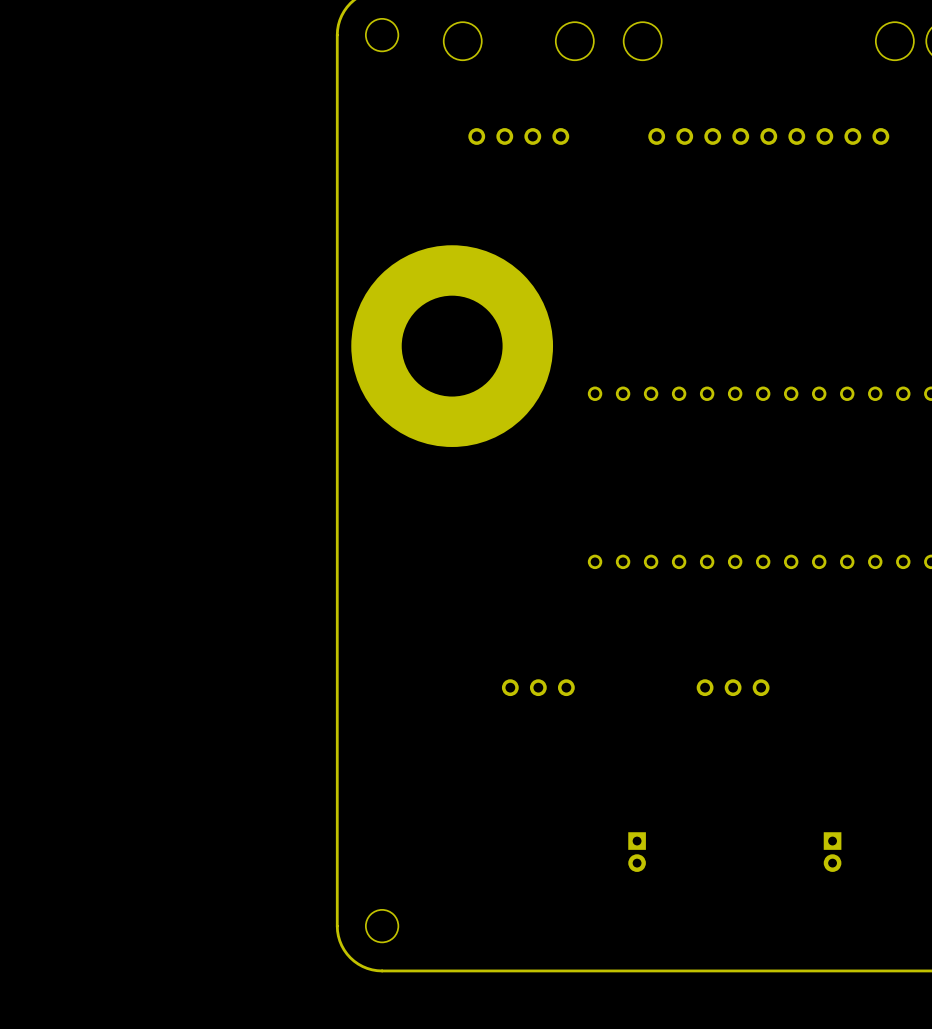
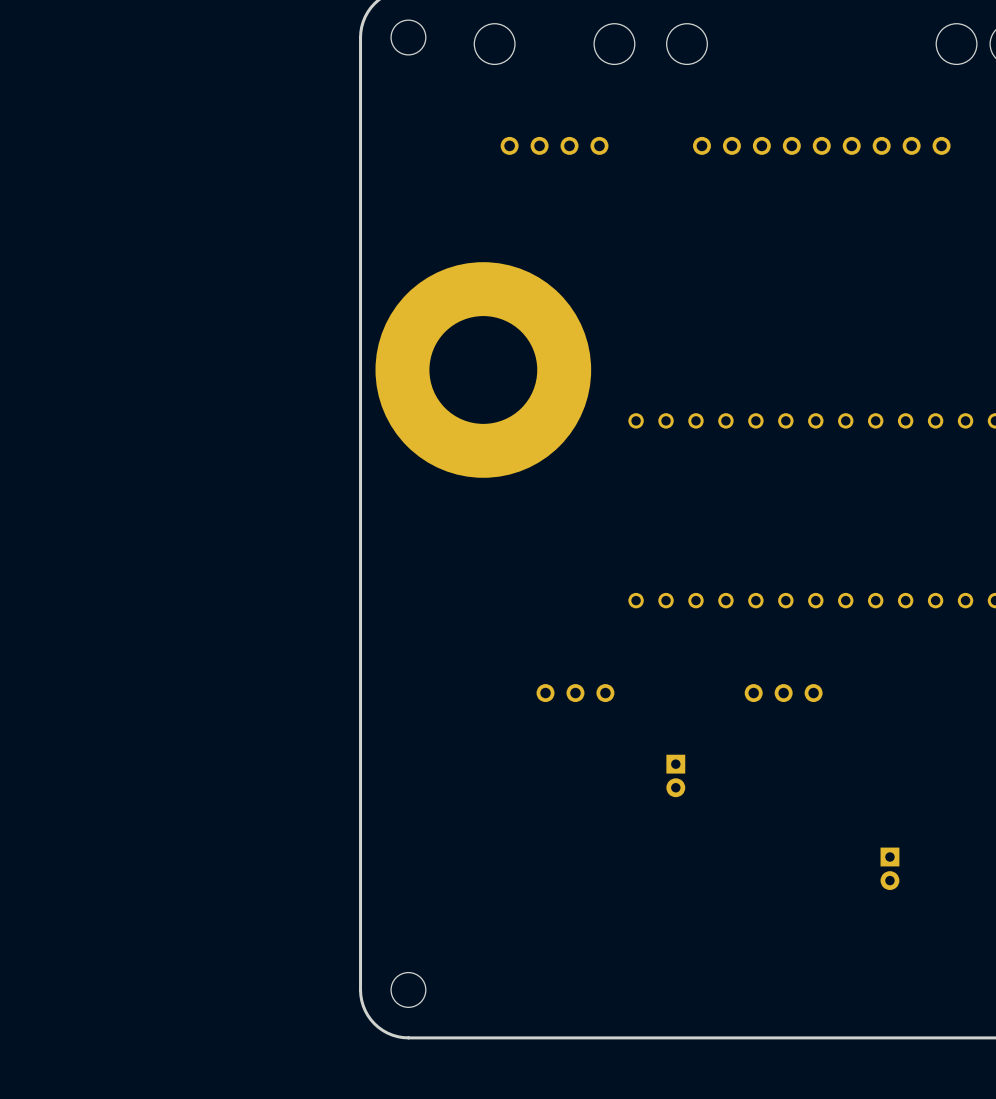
part position: (538, 687) -> (575, 693)
part position: (733, 687) -> (783, 693)
part: none -> (675, 775)
part: (637, 852) -> none
part position: (832, 852) -> (889, 868)

